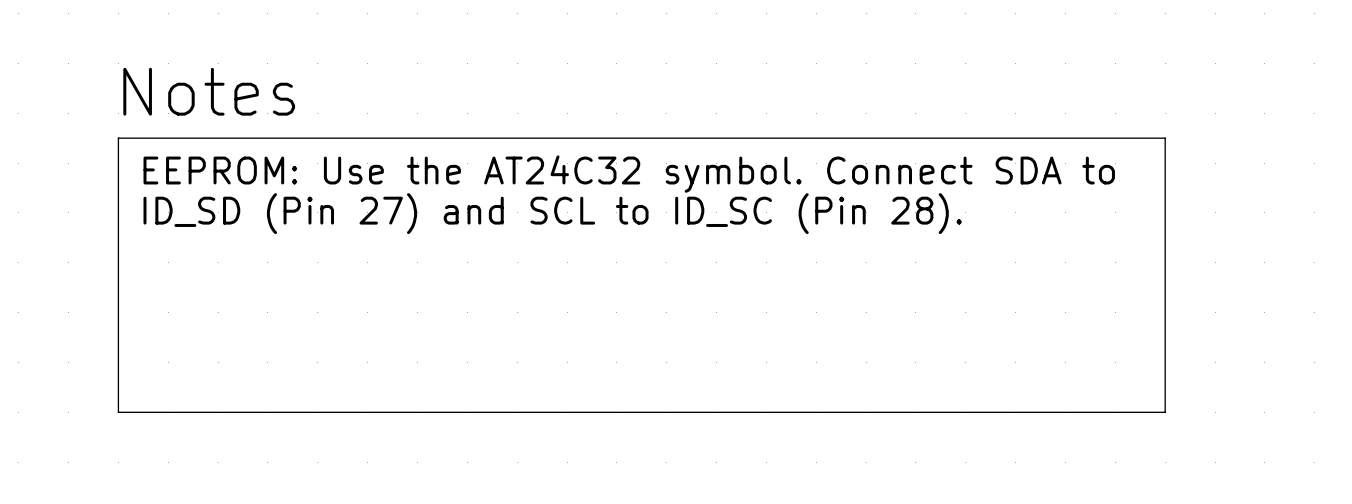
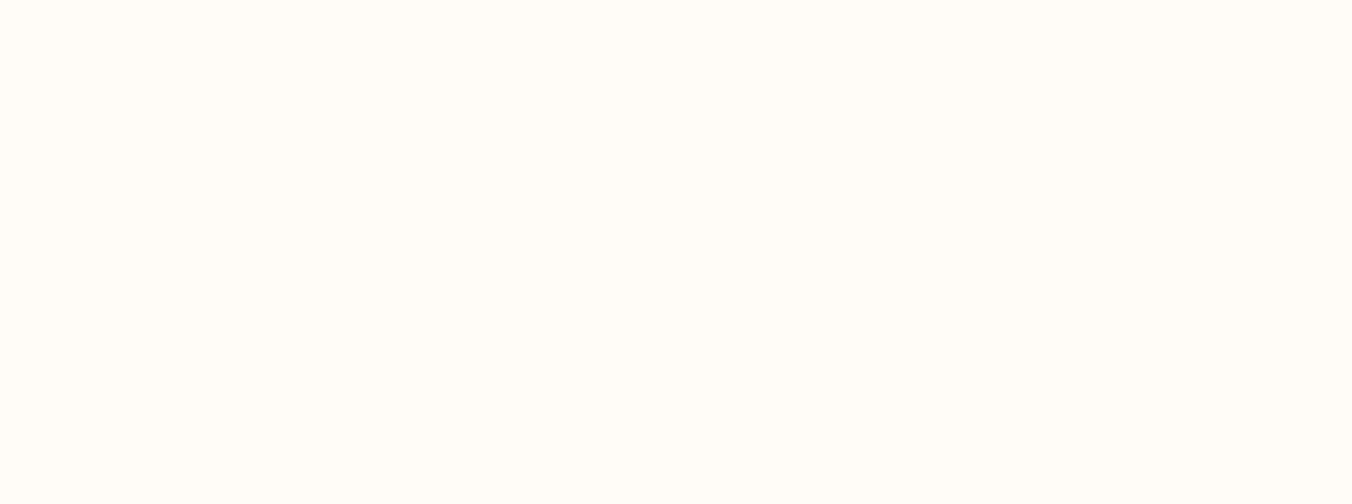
text: Notes (209, 91) -> none
line: (118, 138) (1165, 138) (1165, 412) (118, 412) (118, 138) -> none
text: EEPROM: Use the AT24C32 symbol. Connect SDA to (629, 174) -> none
text: ID_SD (Pin 27) and SCL to ID_SC (Pin 28). (552, 213) -> none

